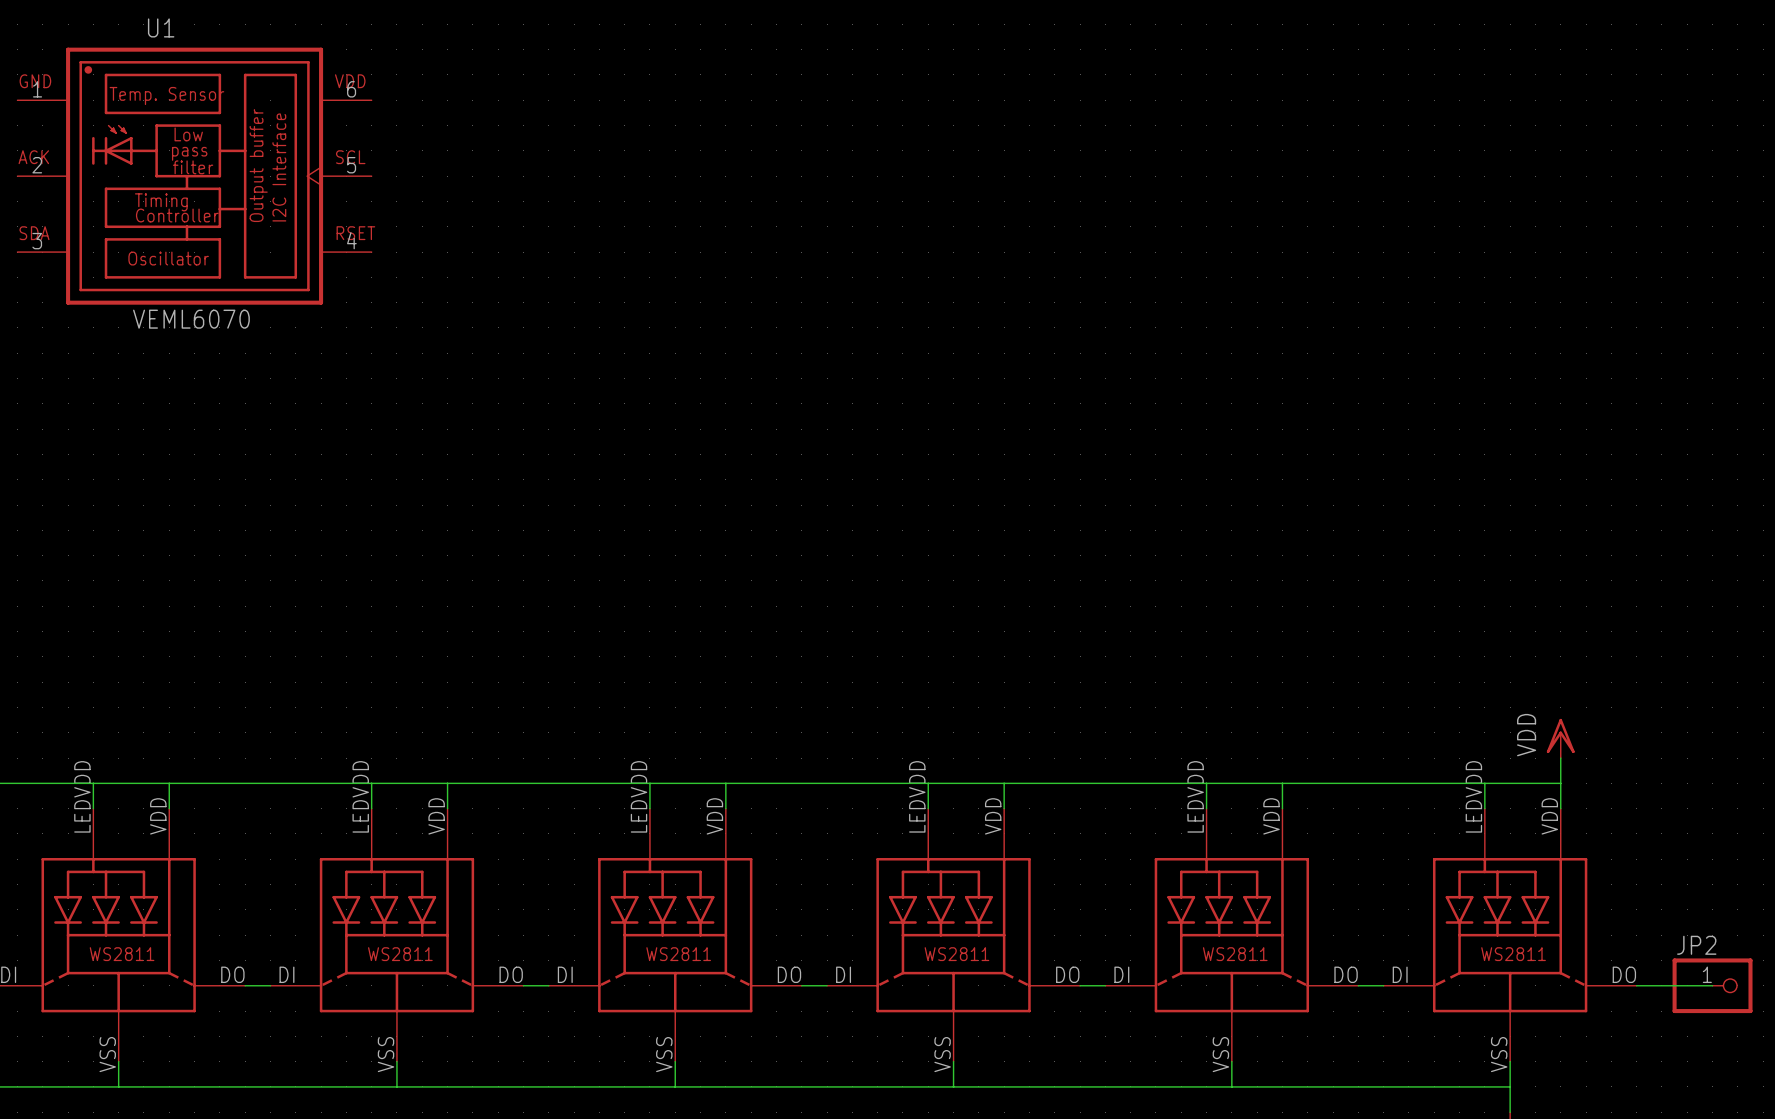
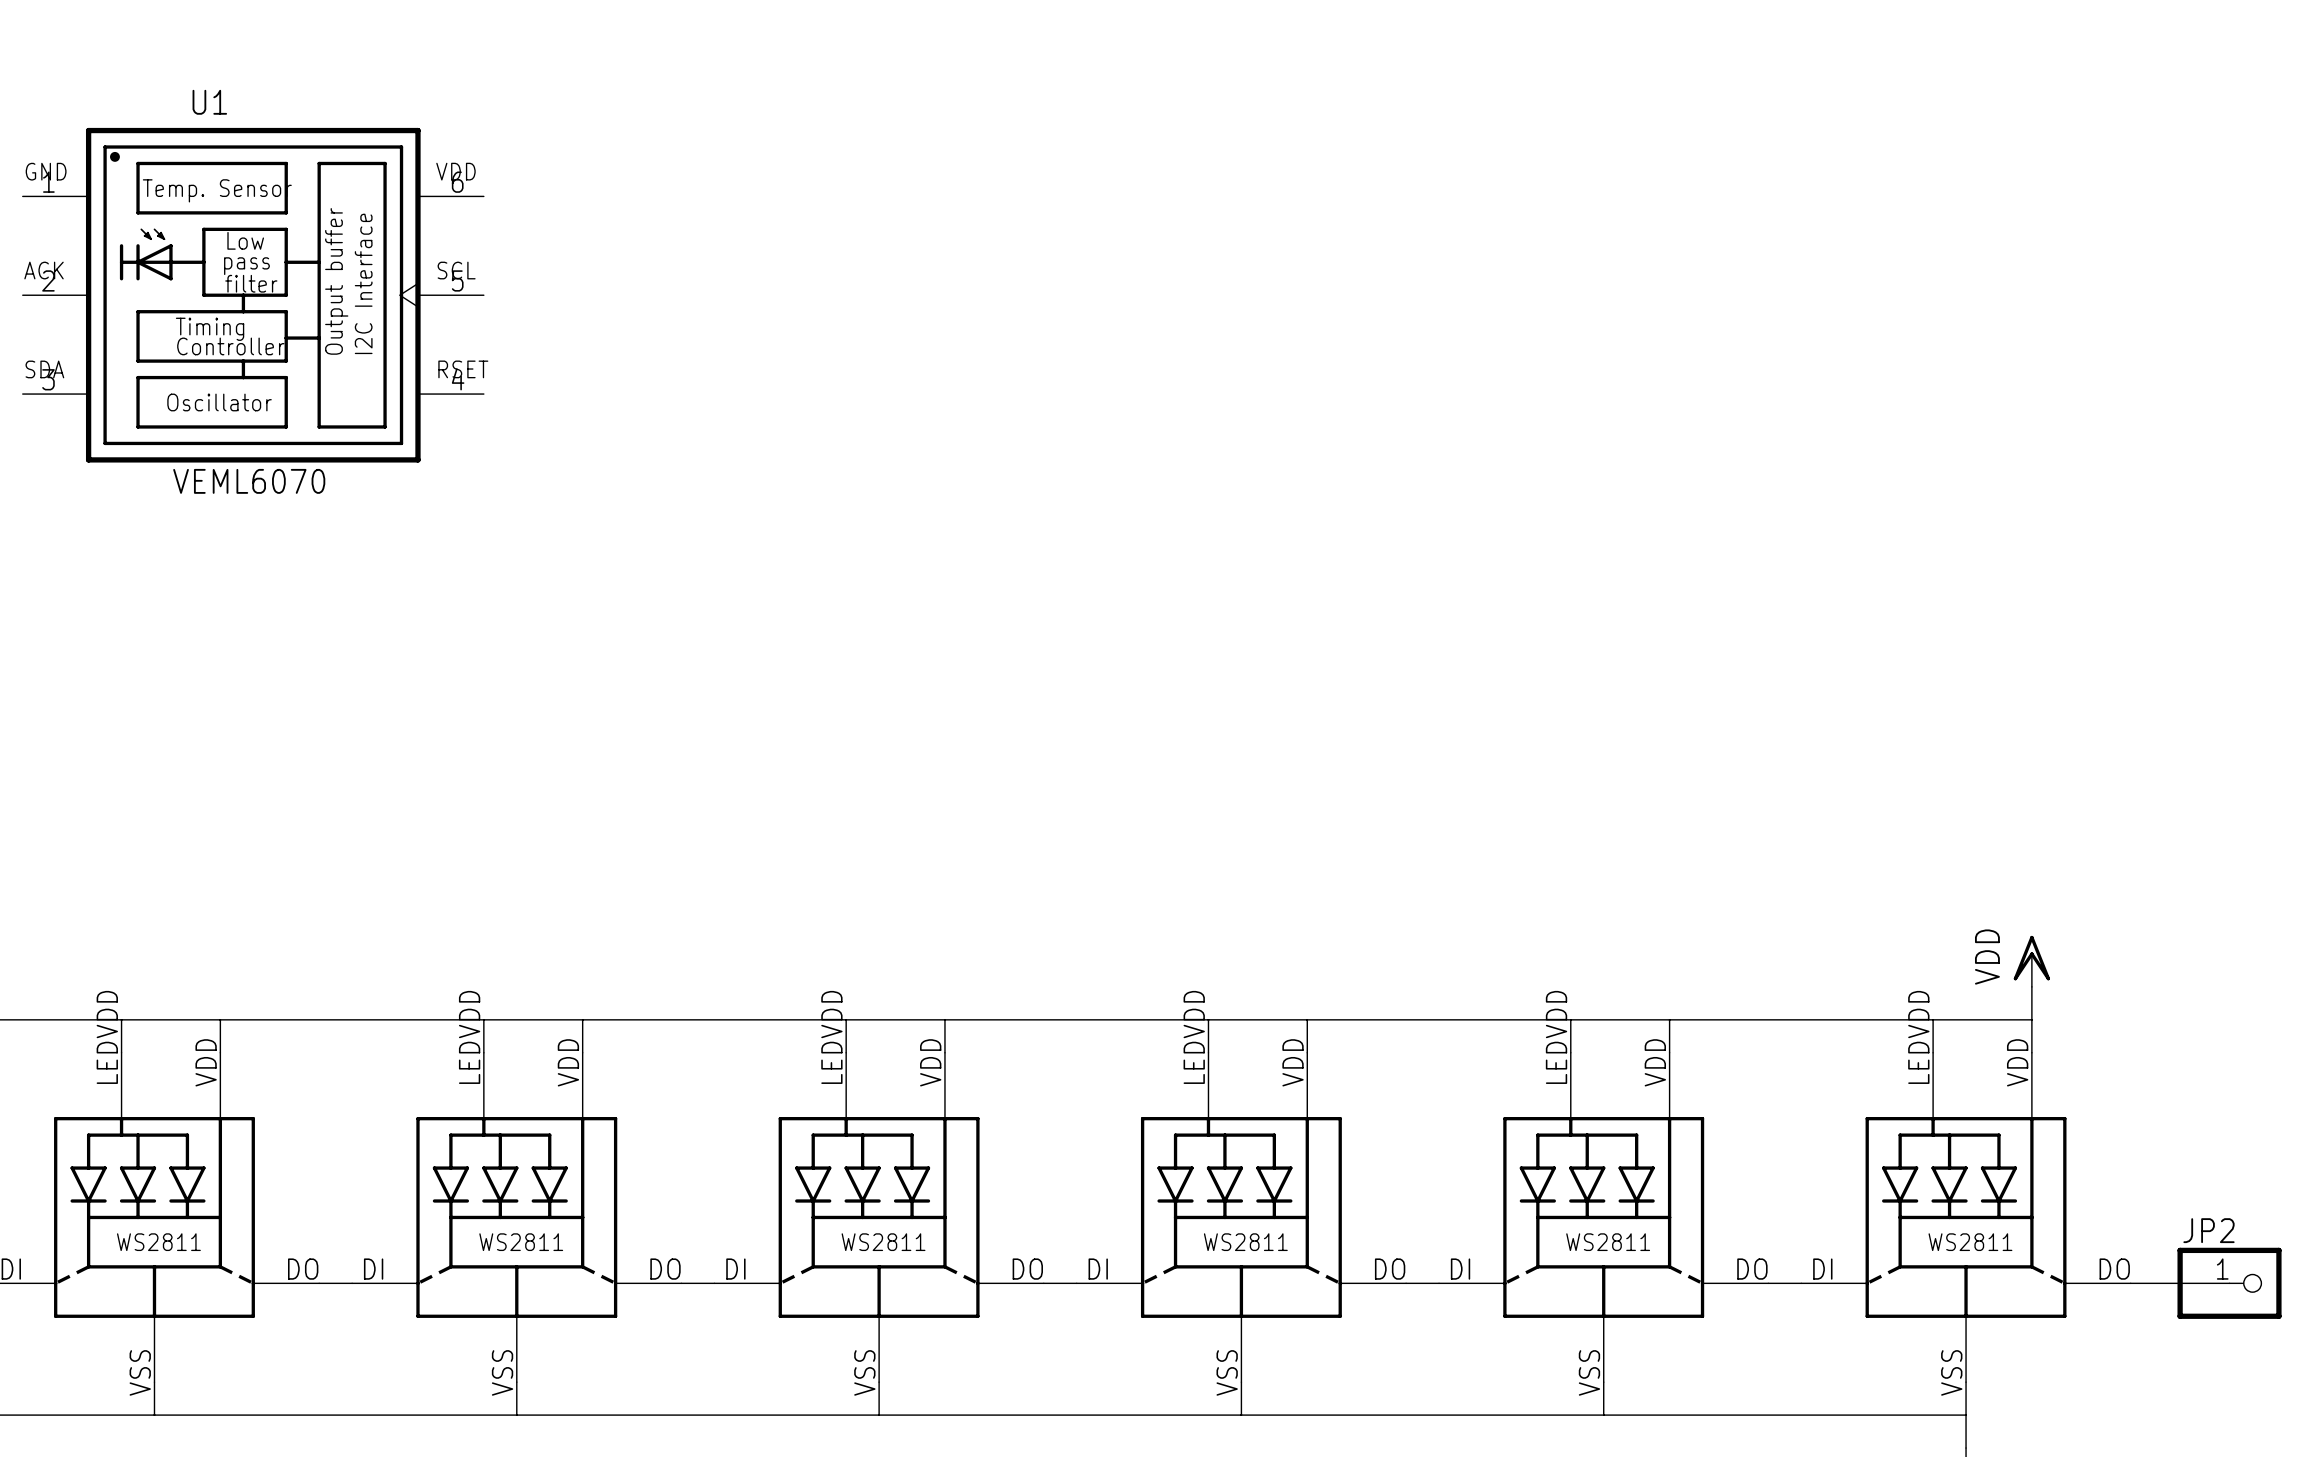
U1 position: (194, 176) -> (253, 295)

